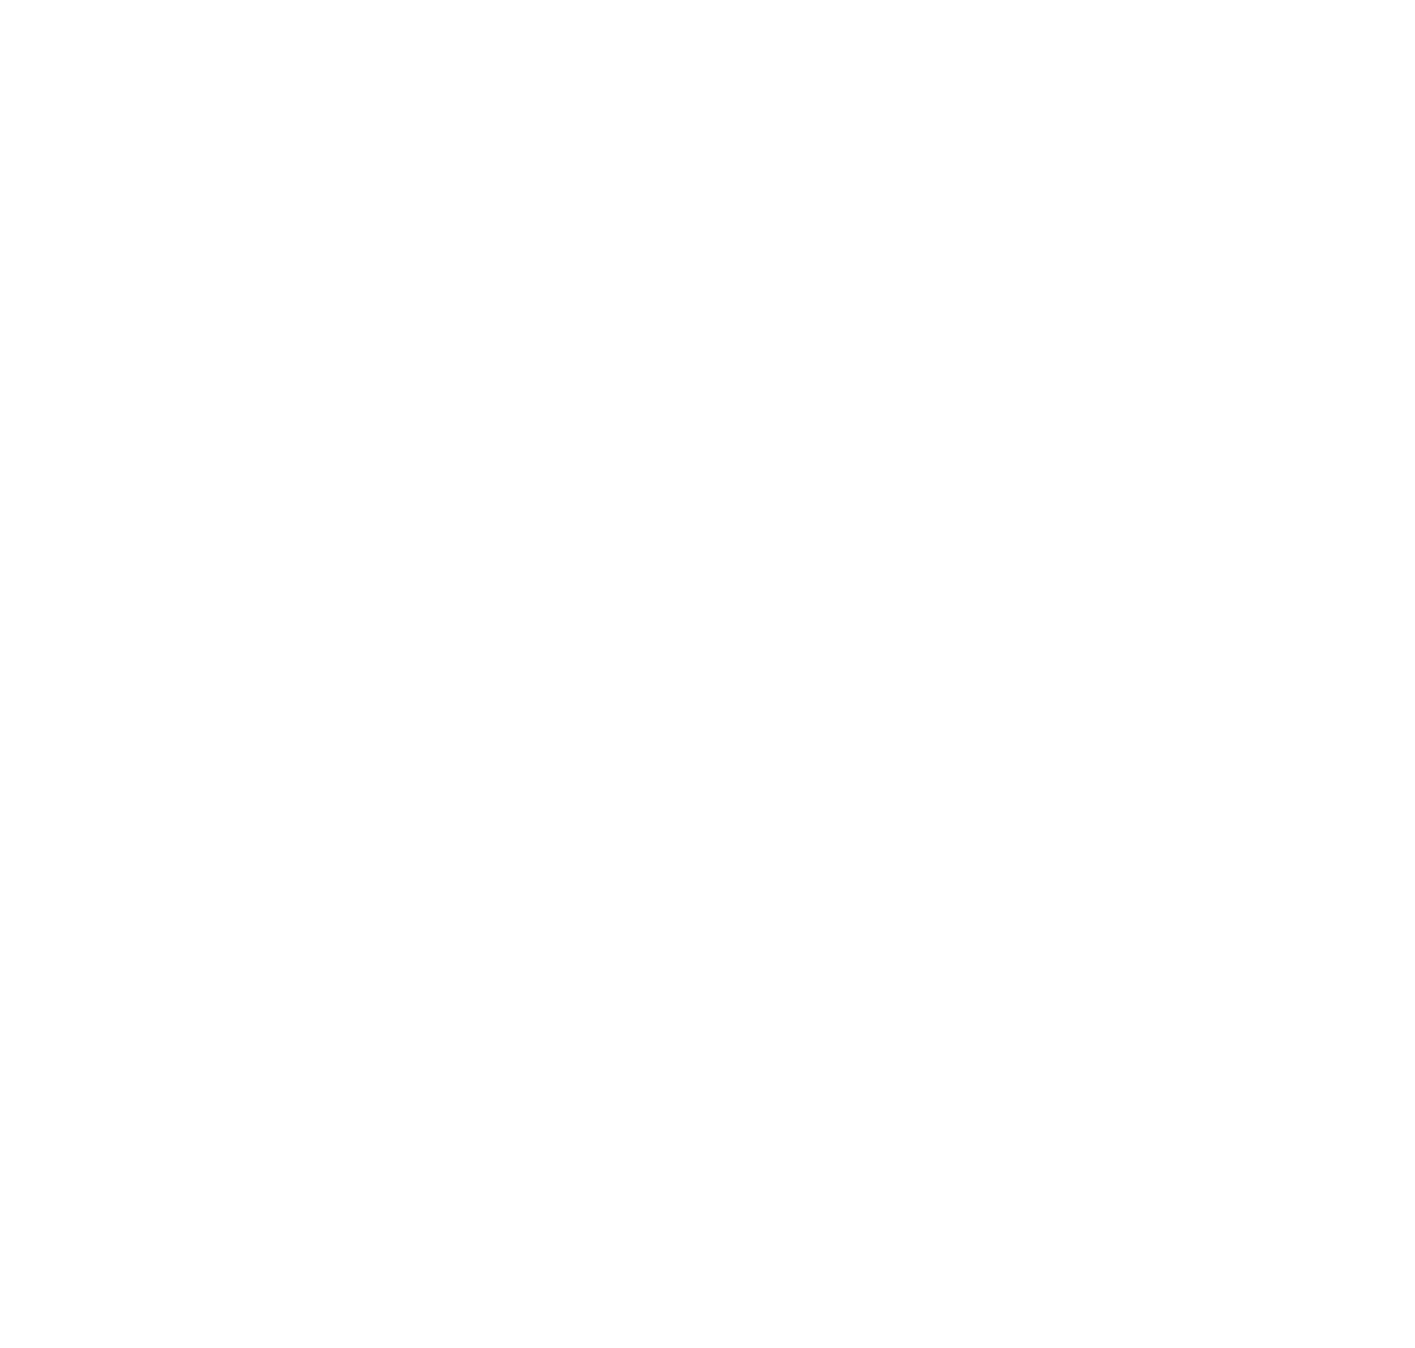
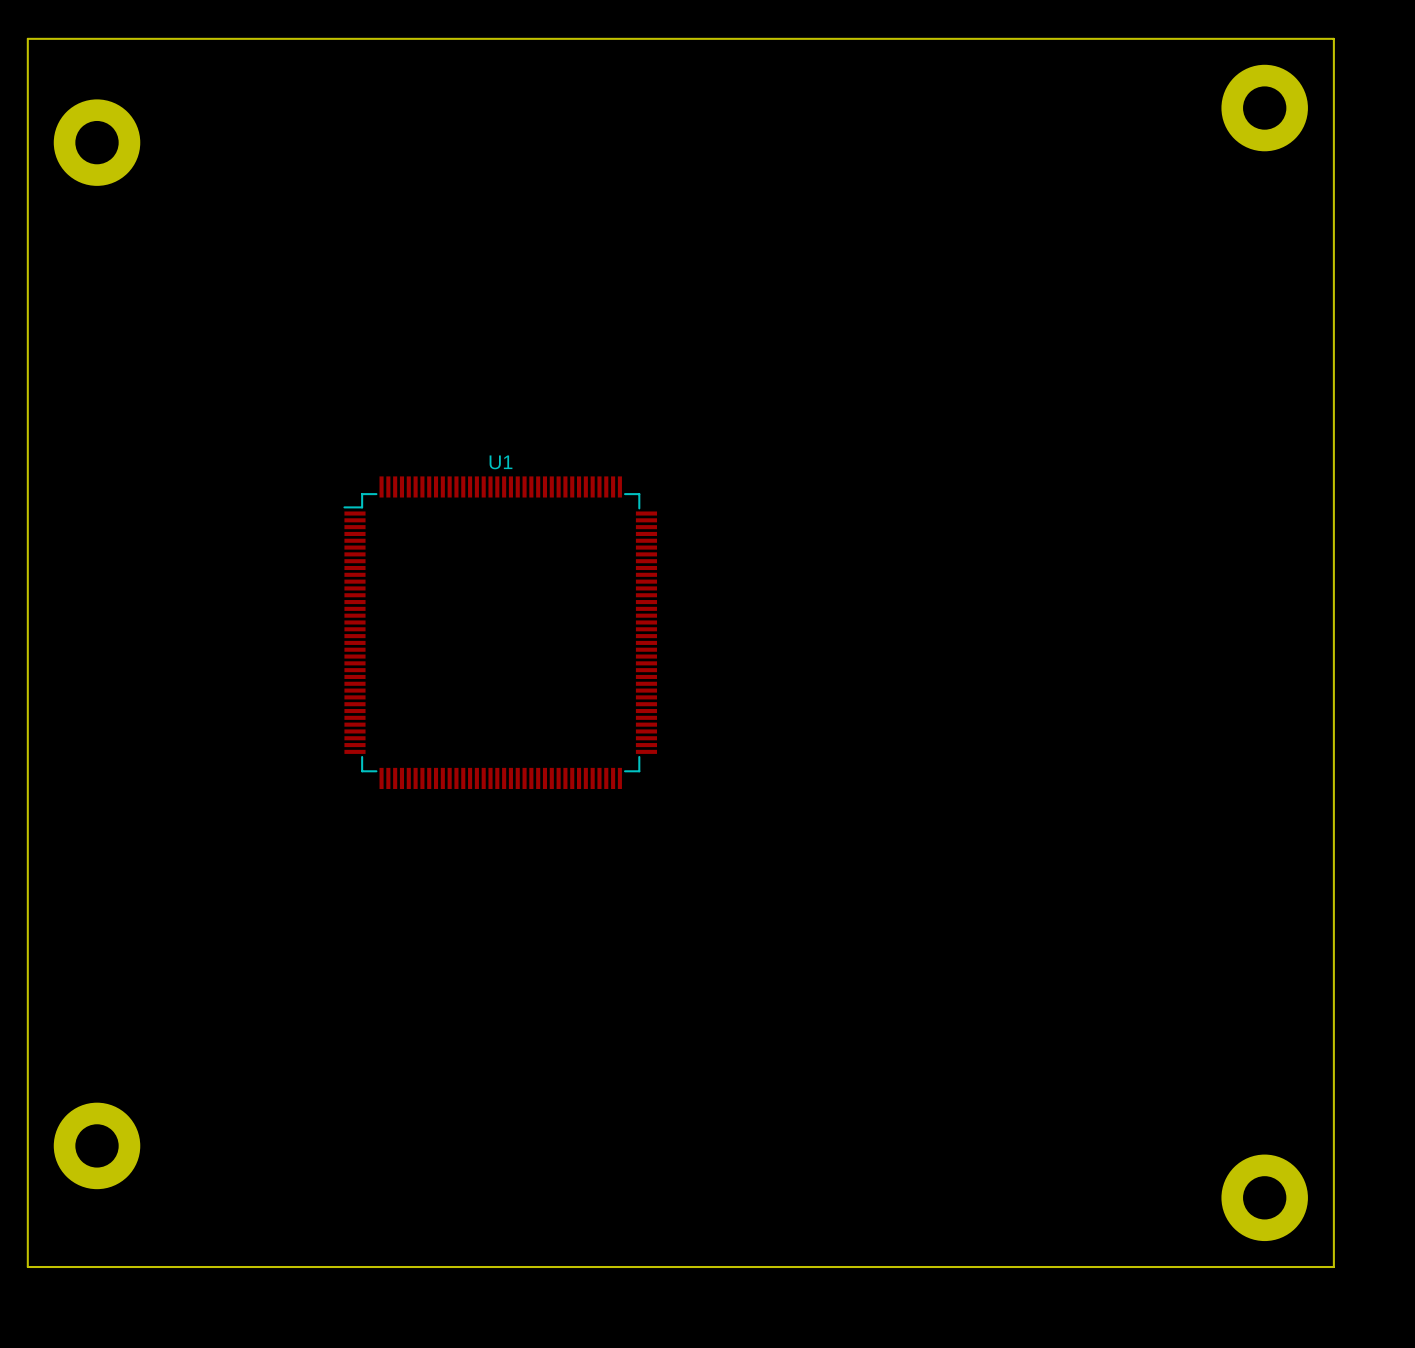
board edge: none -> (27, 38) (27, 1267) (1333, 1267) (1333, 38) (27, 38)
part: none -> (1264, 108)
part: none -> (97, 142)
U1: none -> (500, 632)
part: none -> (97, 1145)
part: none -> (1264, 1197)

